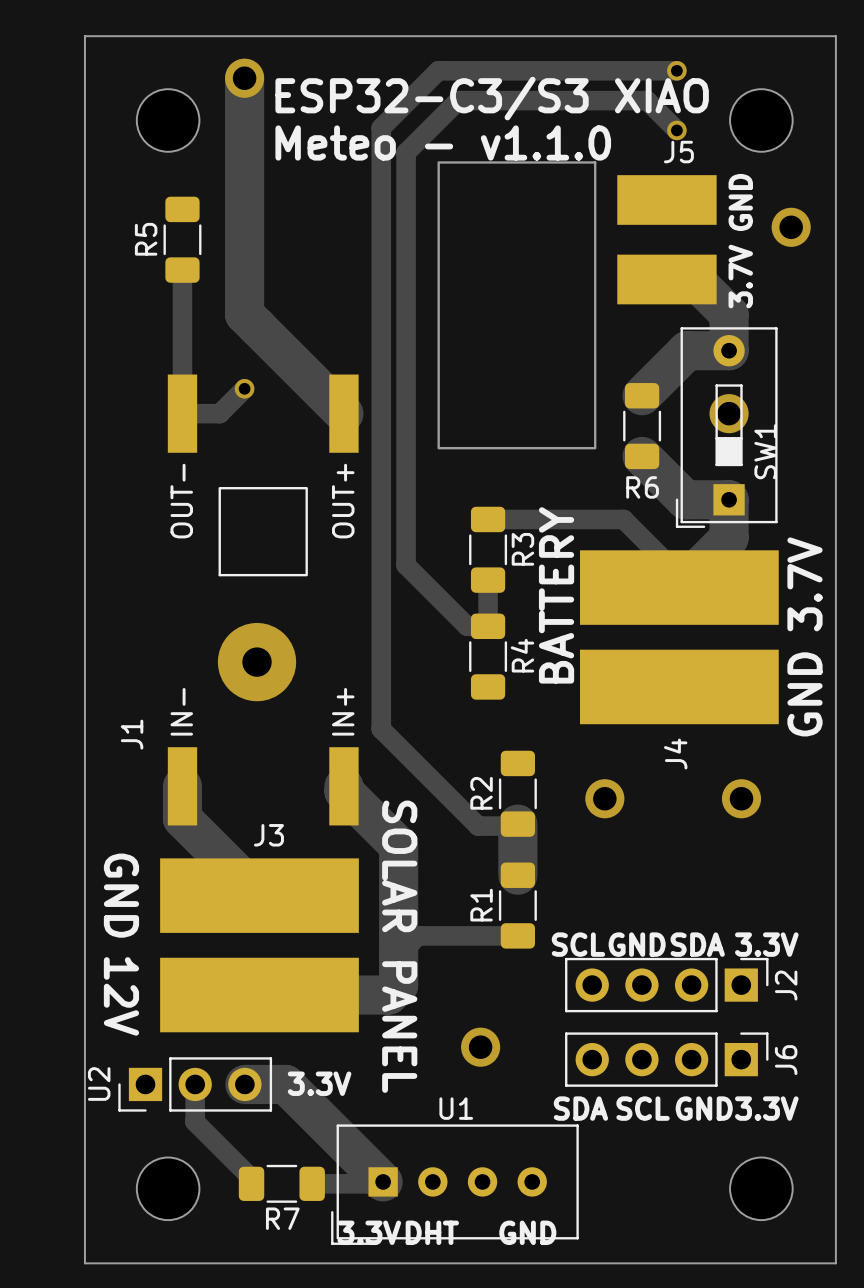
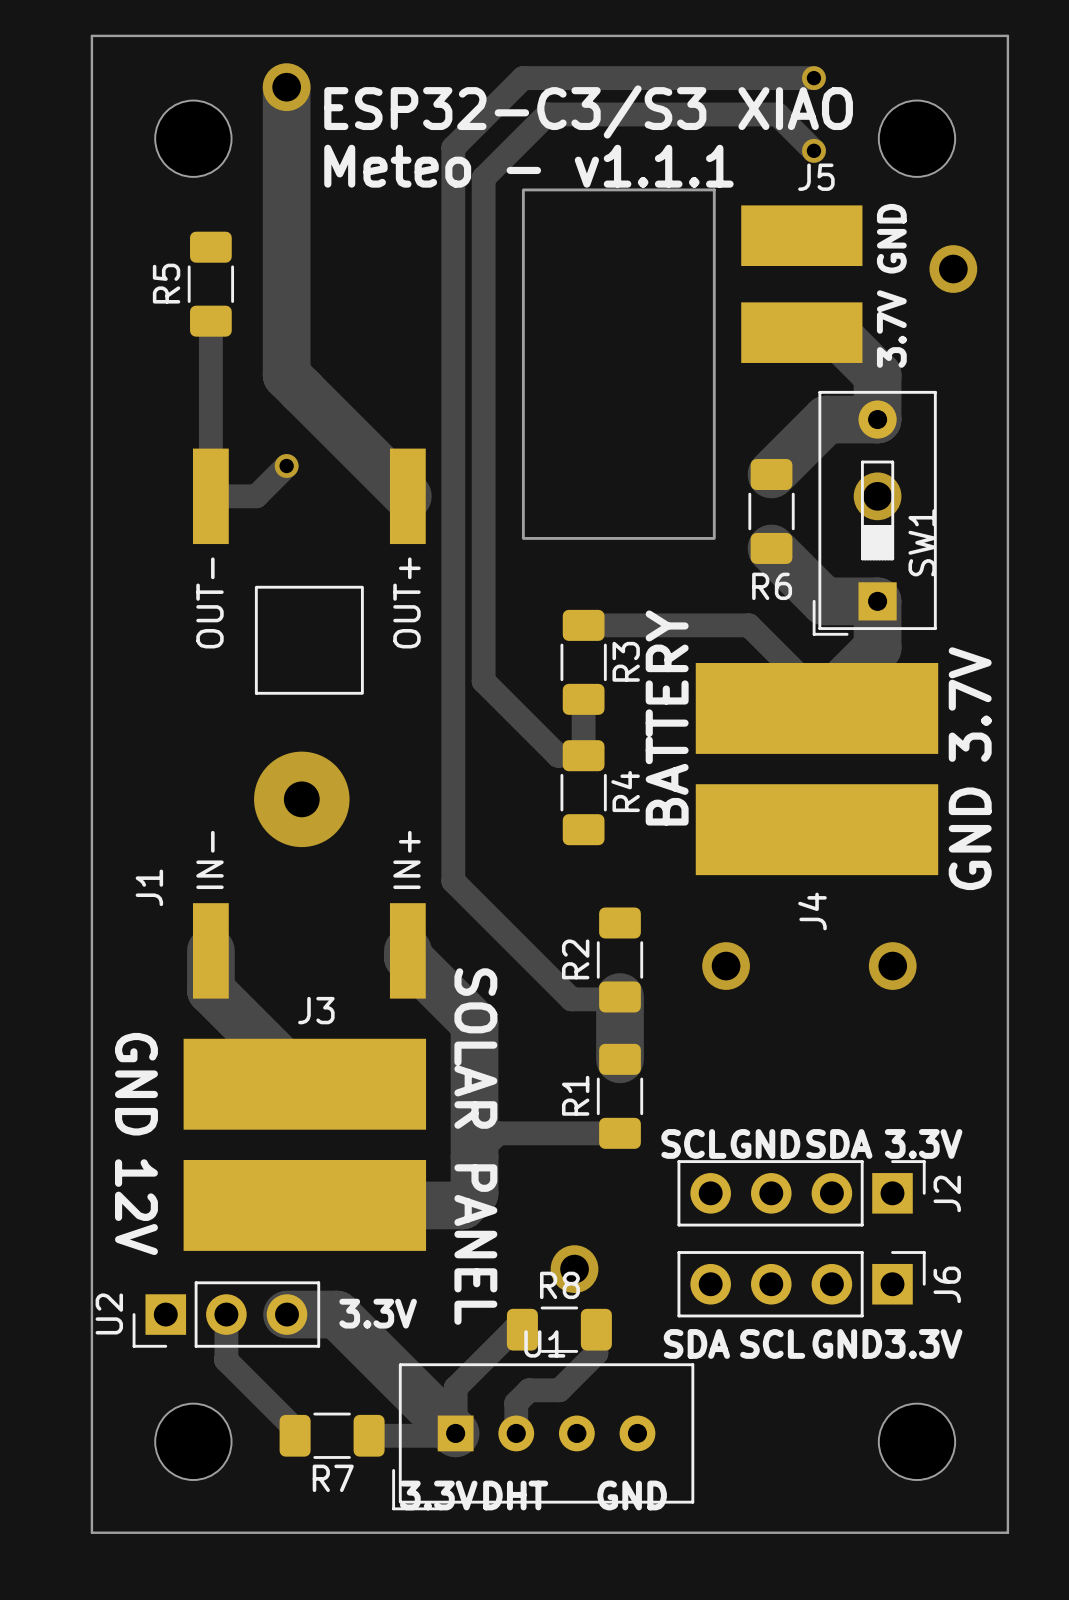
text: Meteo - v1.1.0 (443, 143) -> Meteo - v1.1.1 (528, 166)
track: none -> (522, 1329) (513, 1329) (455, 1387) (455, 1433)
R8: none -> (559, 1329)
track: none -> (596, 1329) (596, 1353) (559, 1390) (529, 1390) (516, 1403) (516, 1433)

